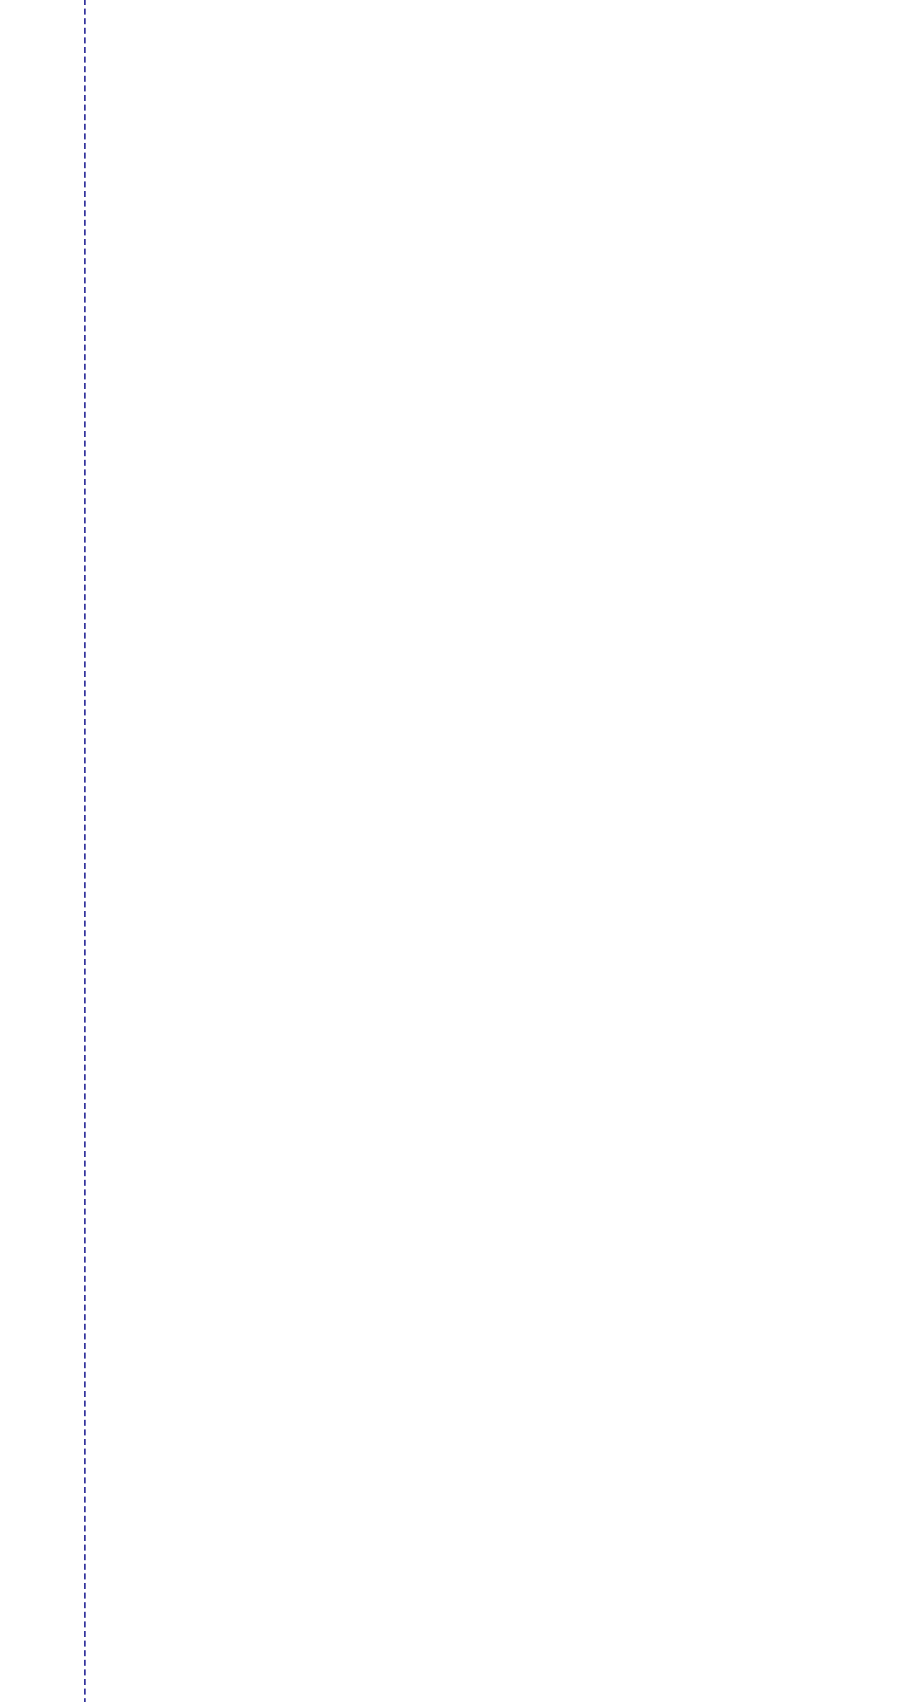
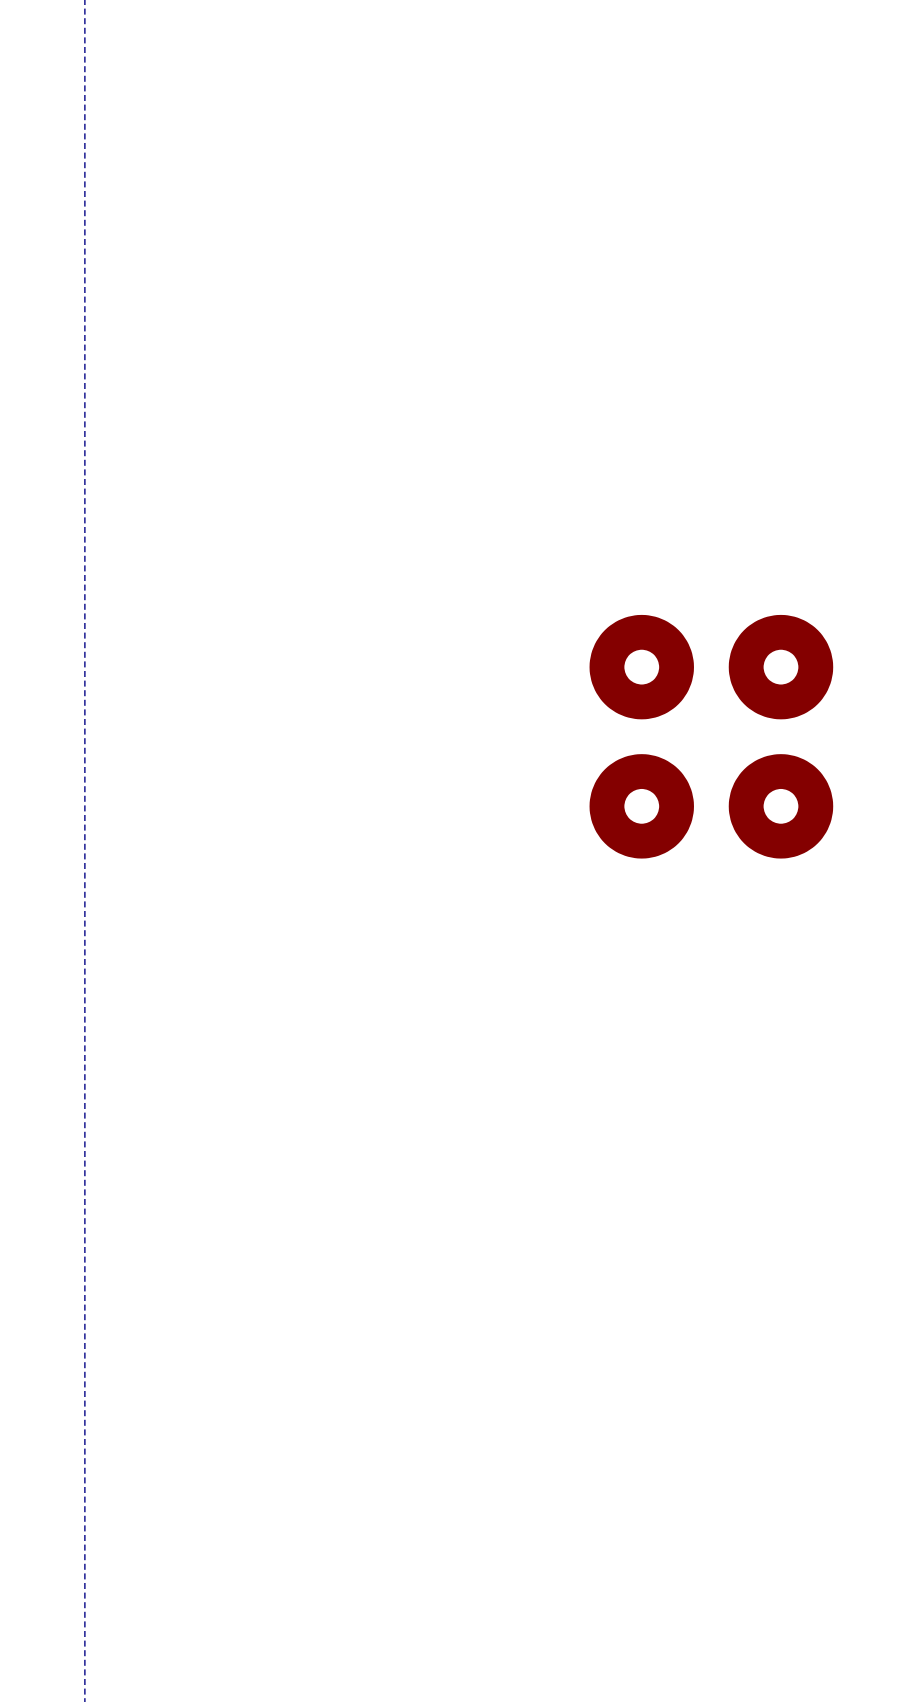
part: none -> (641, 667)
part: none -> (780, 667)
part: none -> (641, 806)
part: none -> (780, 806)

